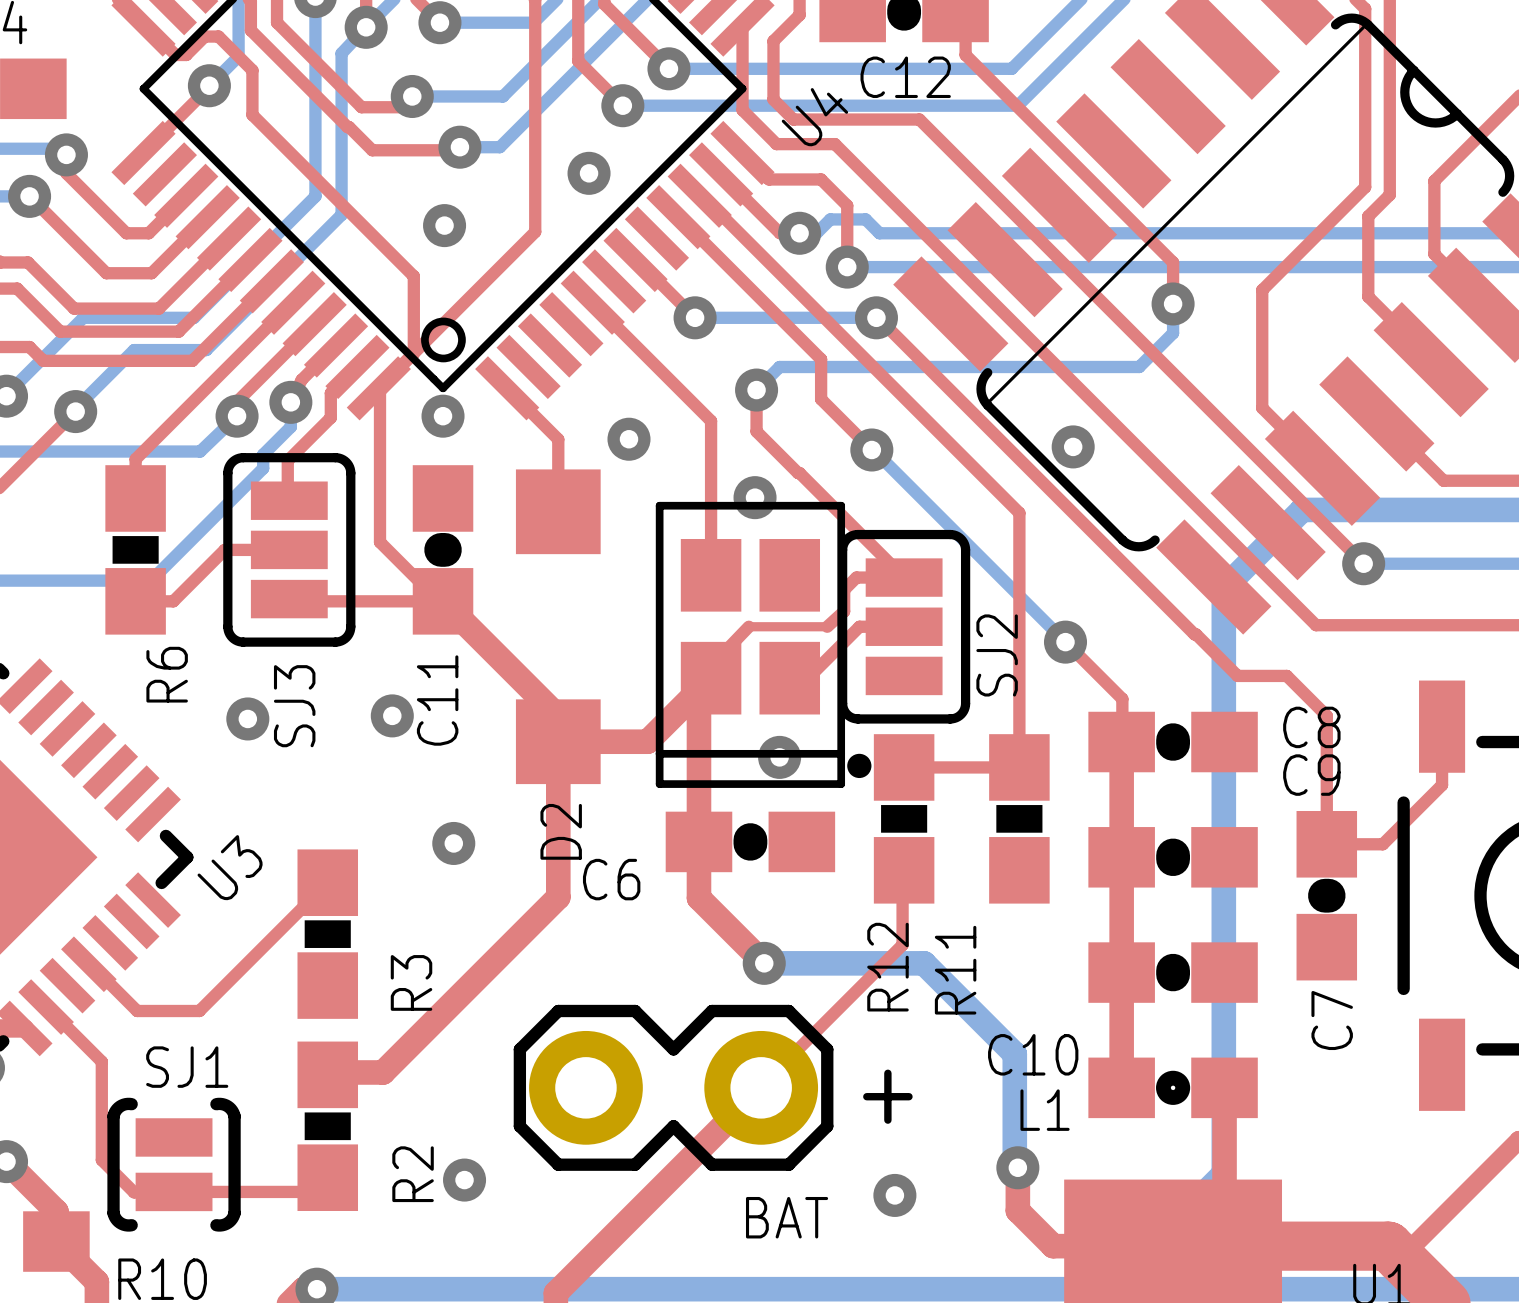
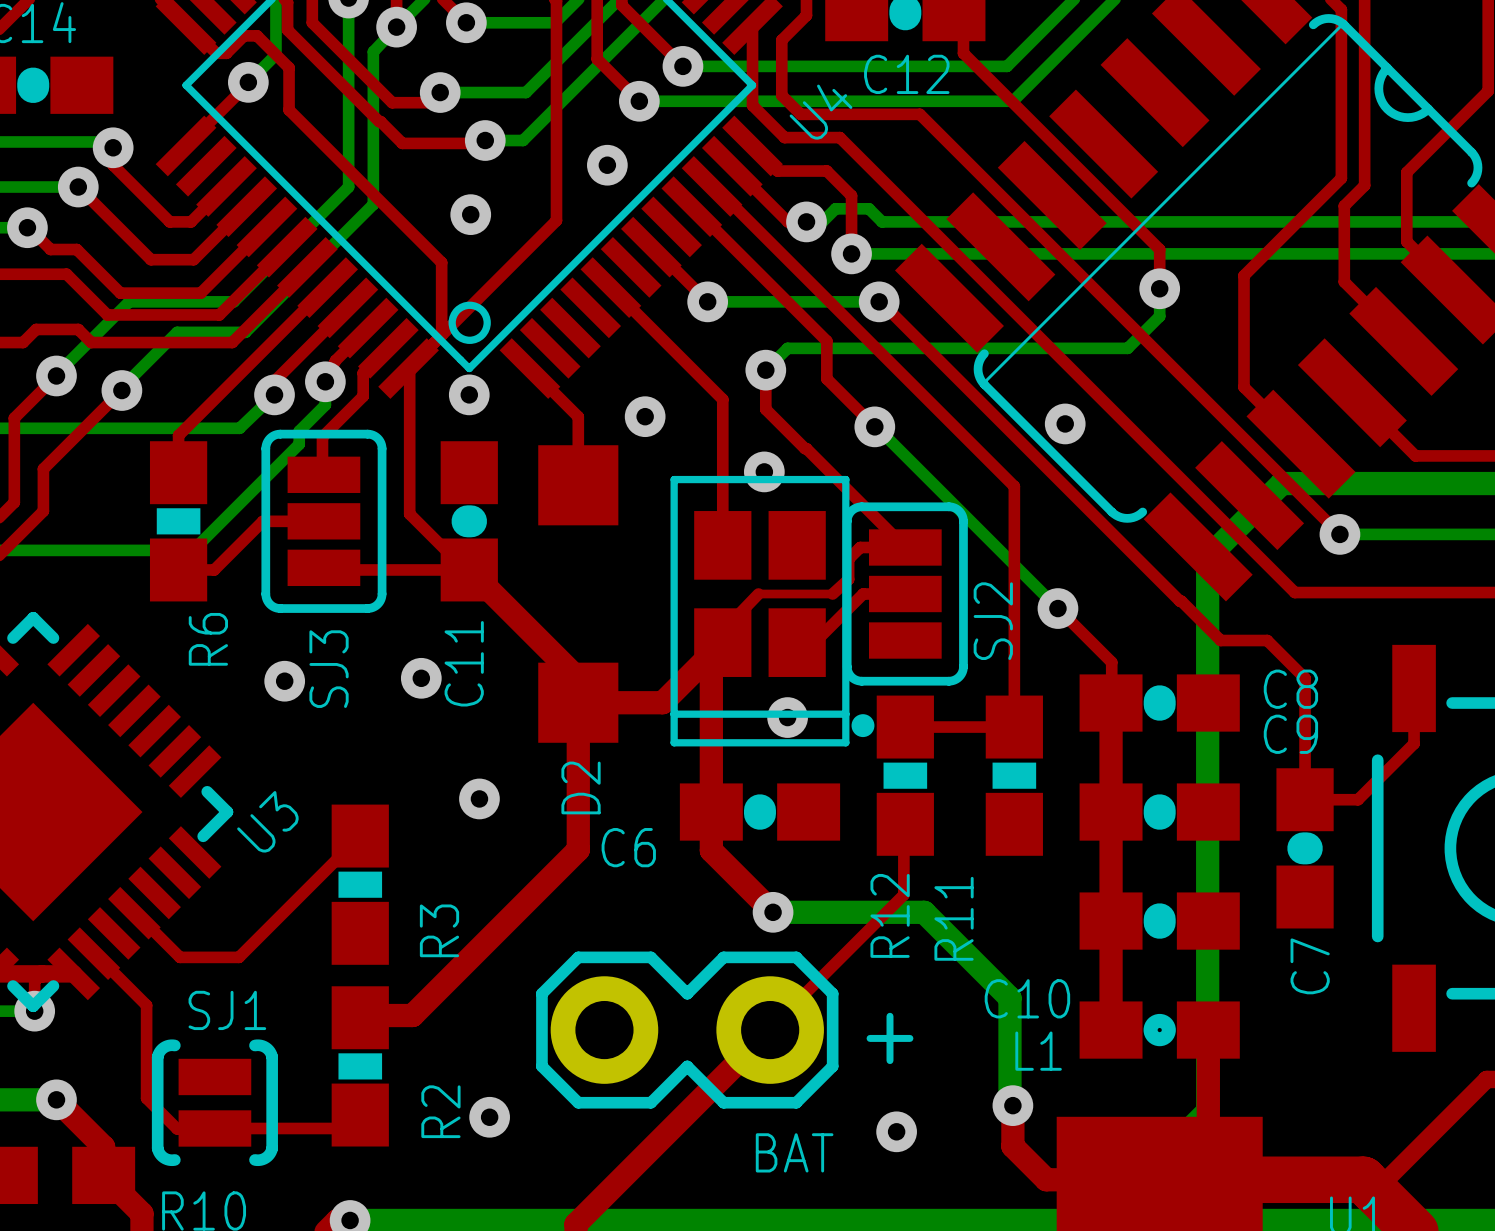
C6 position: (750, 841) -> (759, 812)

